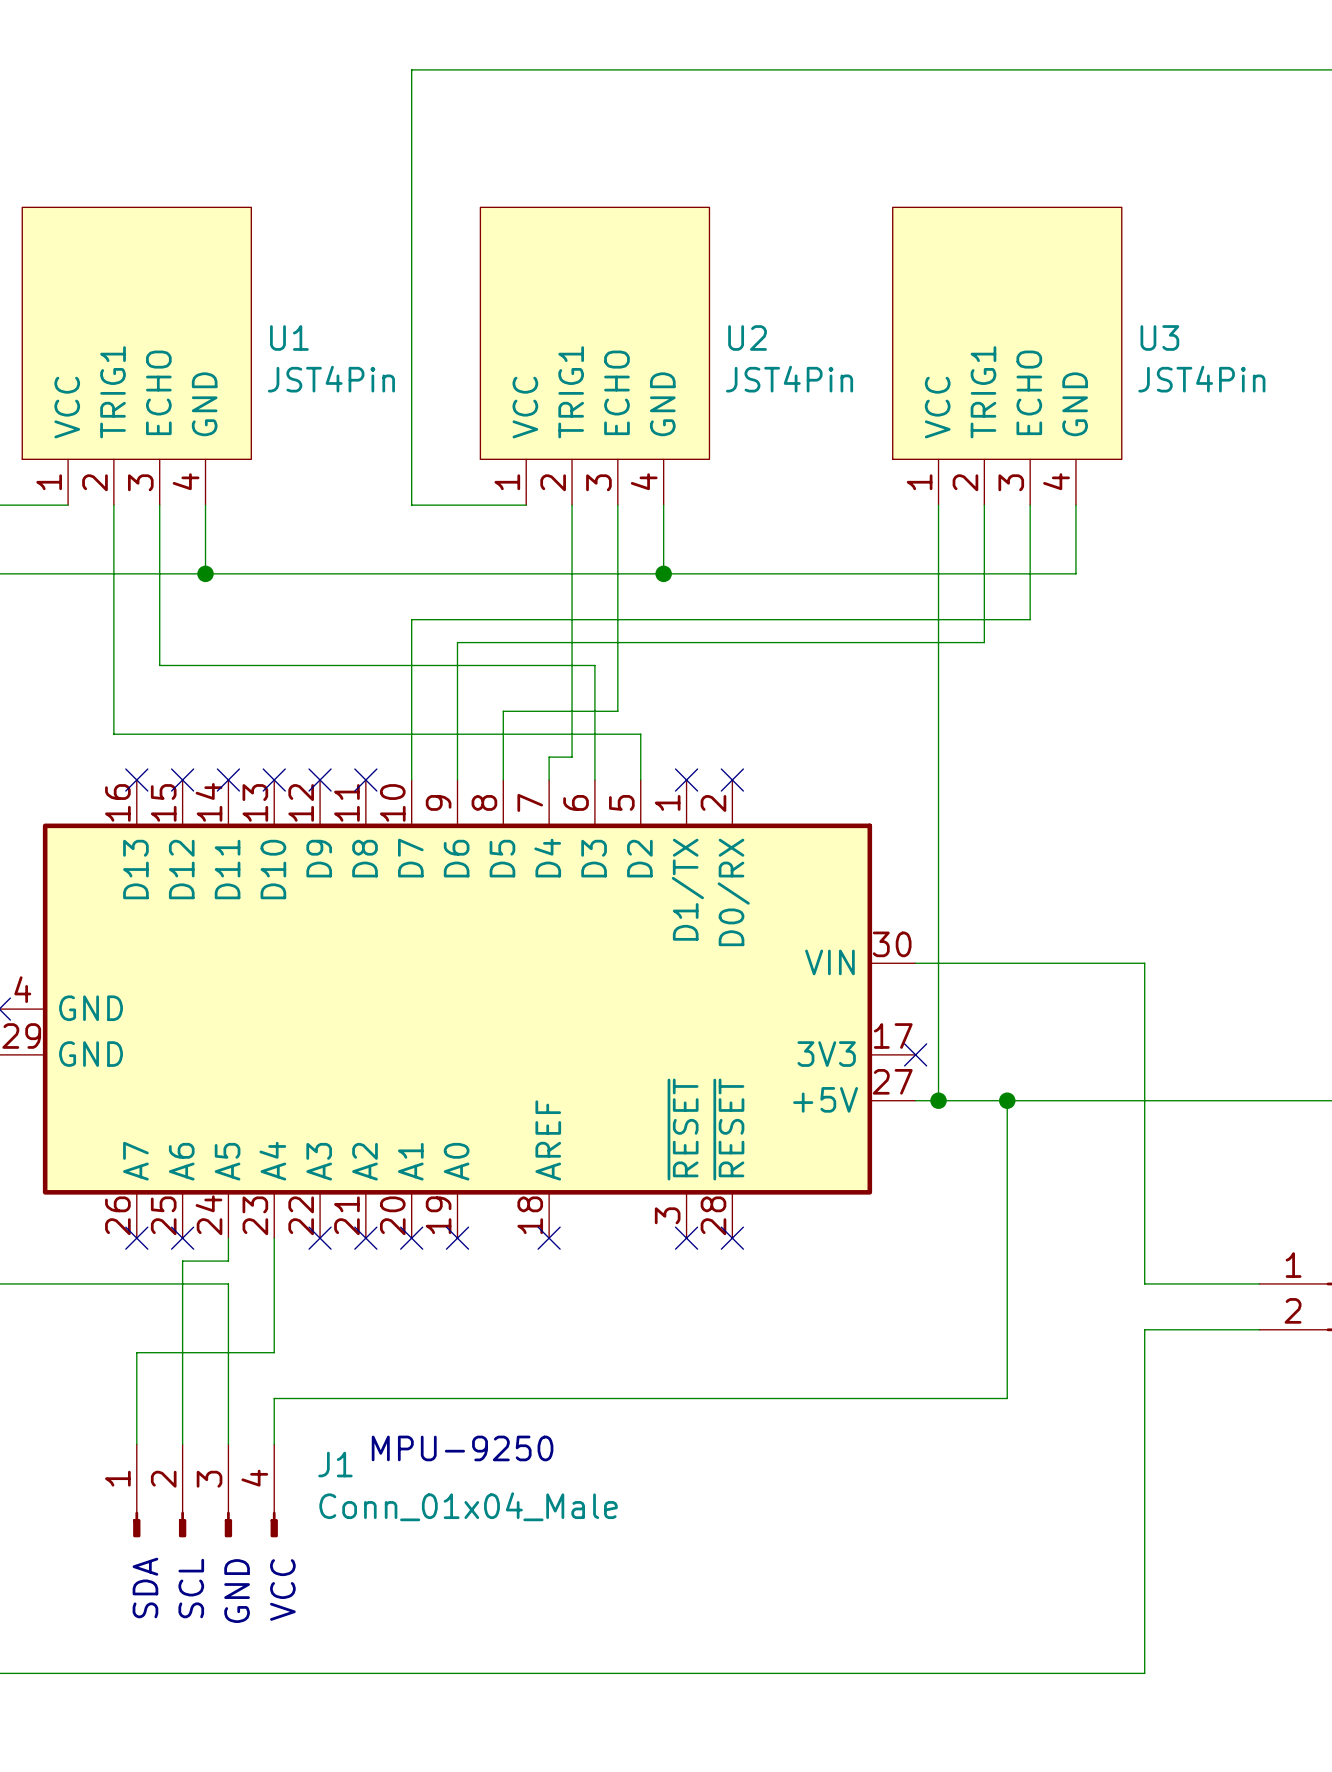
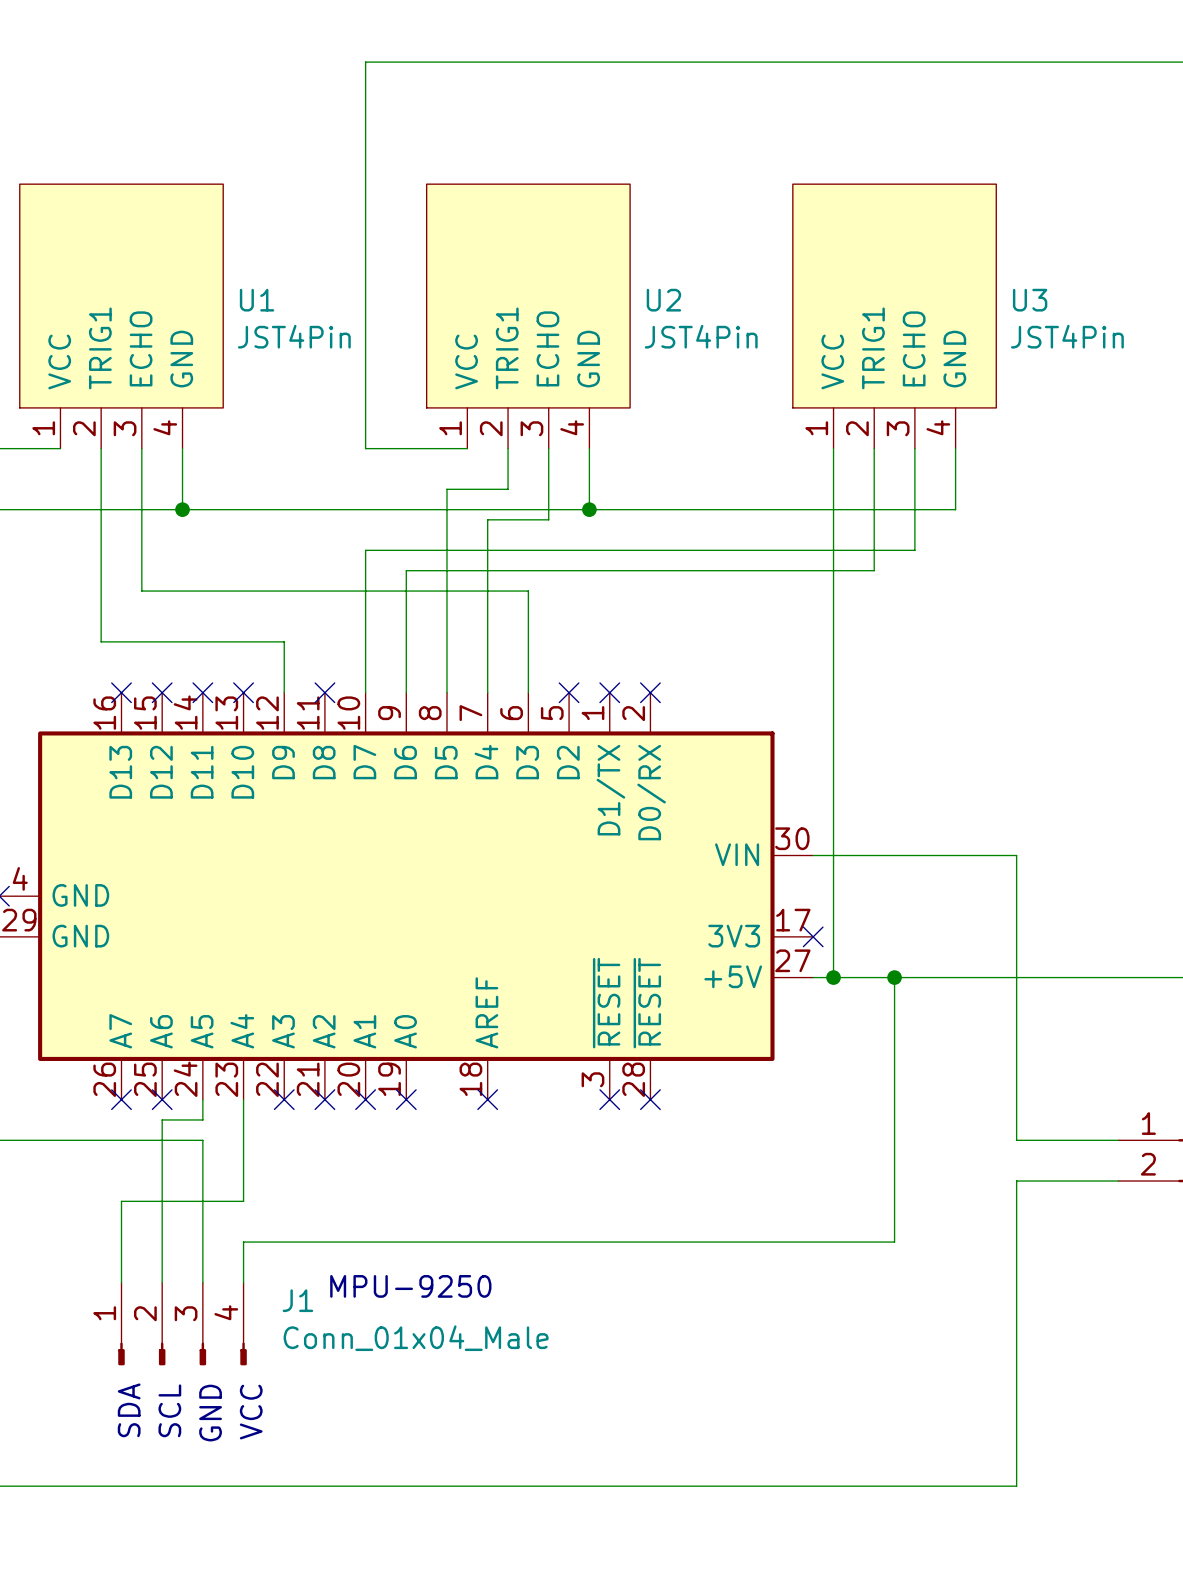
wire: (572, 550) (572, 757) (549, 757) -> (548, 519) (487, 519) (487, 672)
wire: (617, 585) (617, 711) (503, 711) -> (508, 489) (446, 489) (446, 631)
wire: (113, 722) (113, 734) (640, 734) (640, 780) -> (101, 641) (284, 641) (284, 692)
no-connect mark: (320, 780) -> none
no-connect mark: none -> (569, 692)

